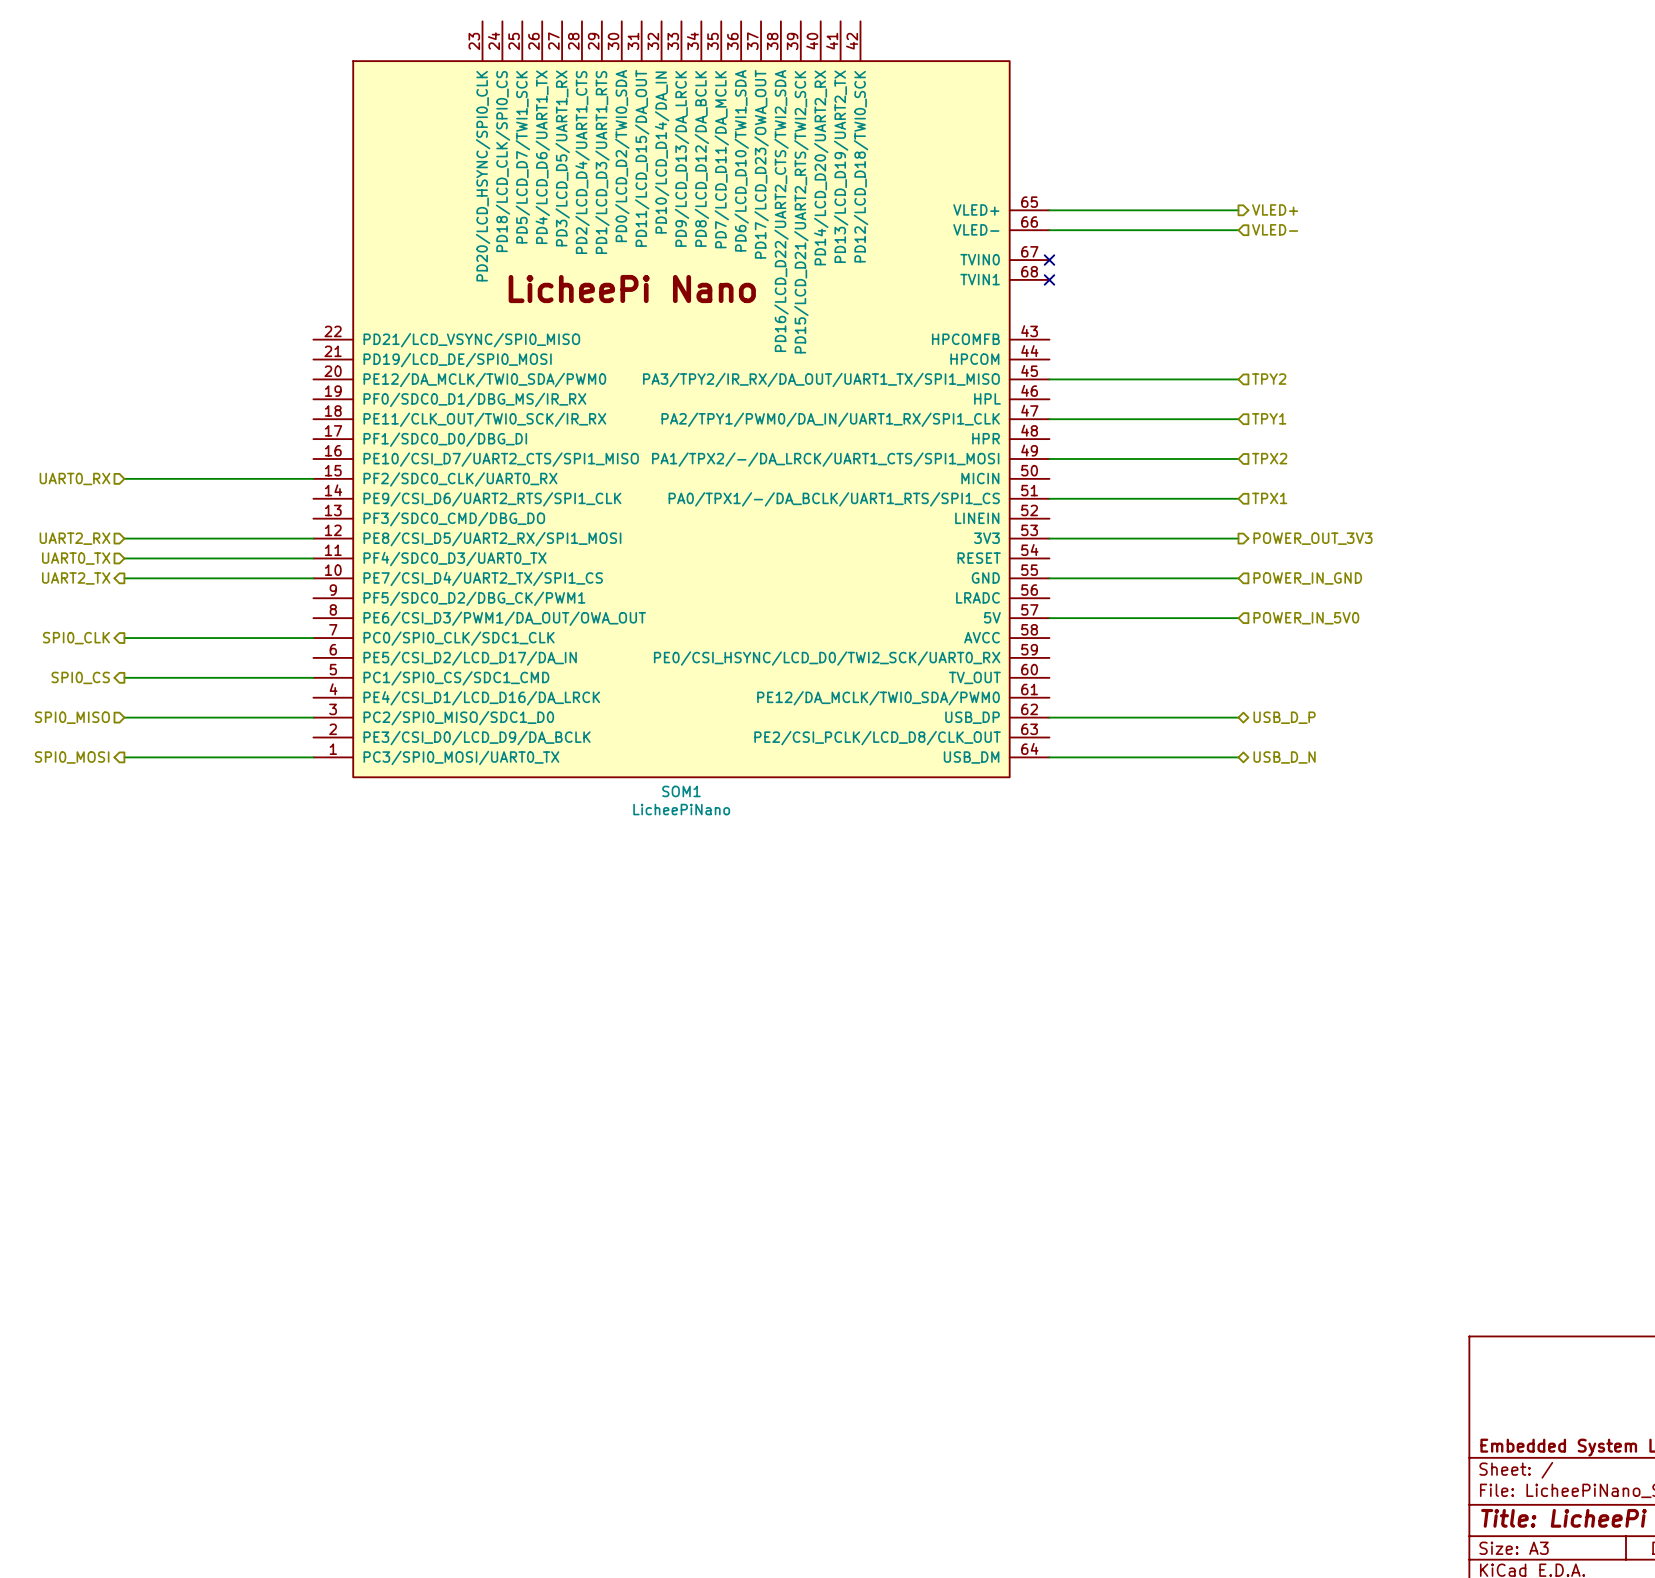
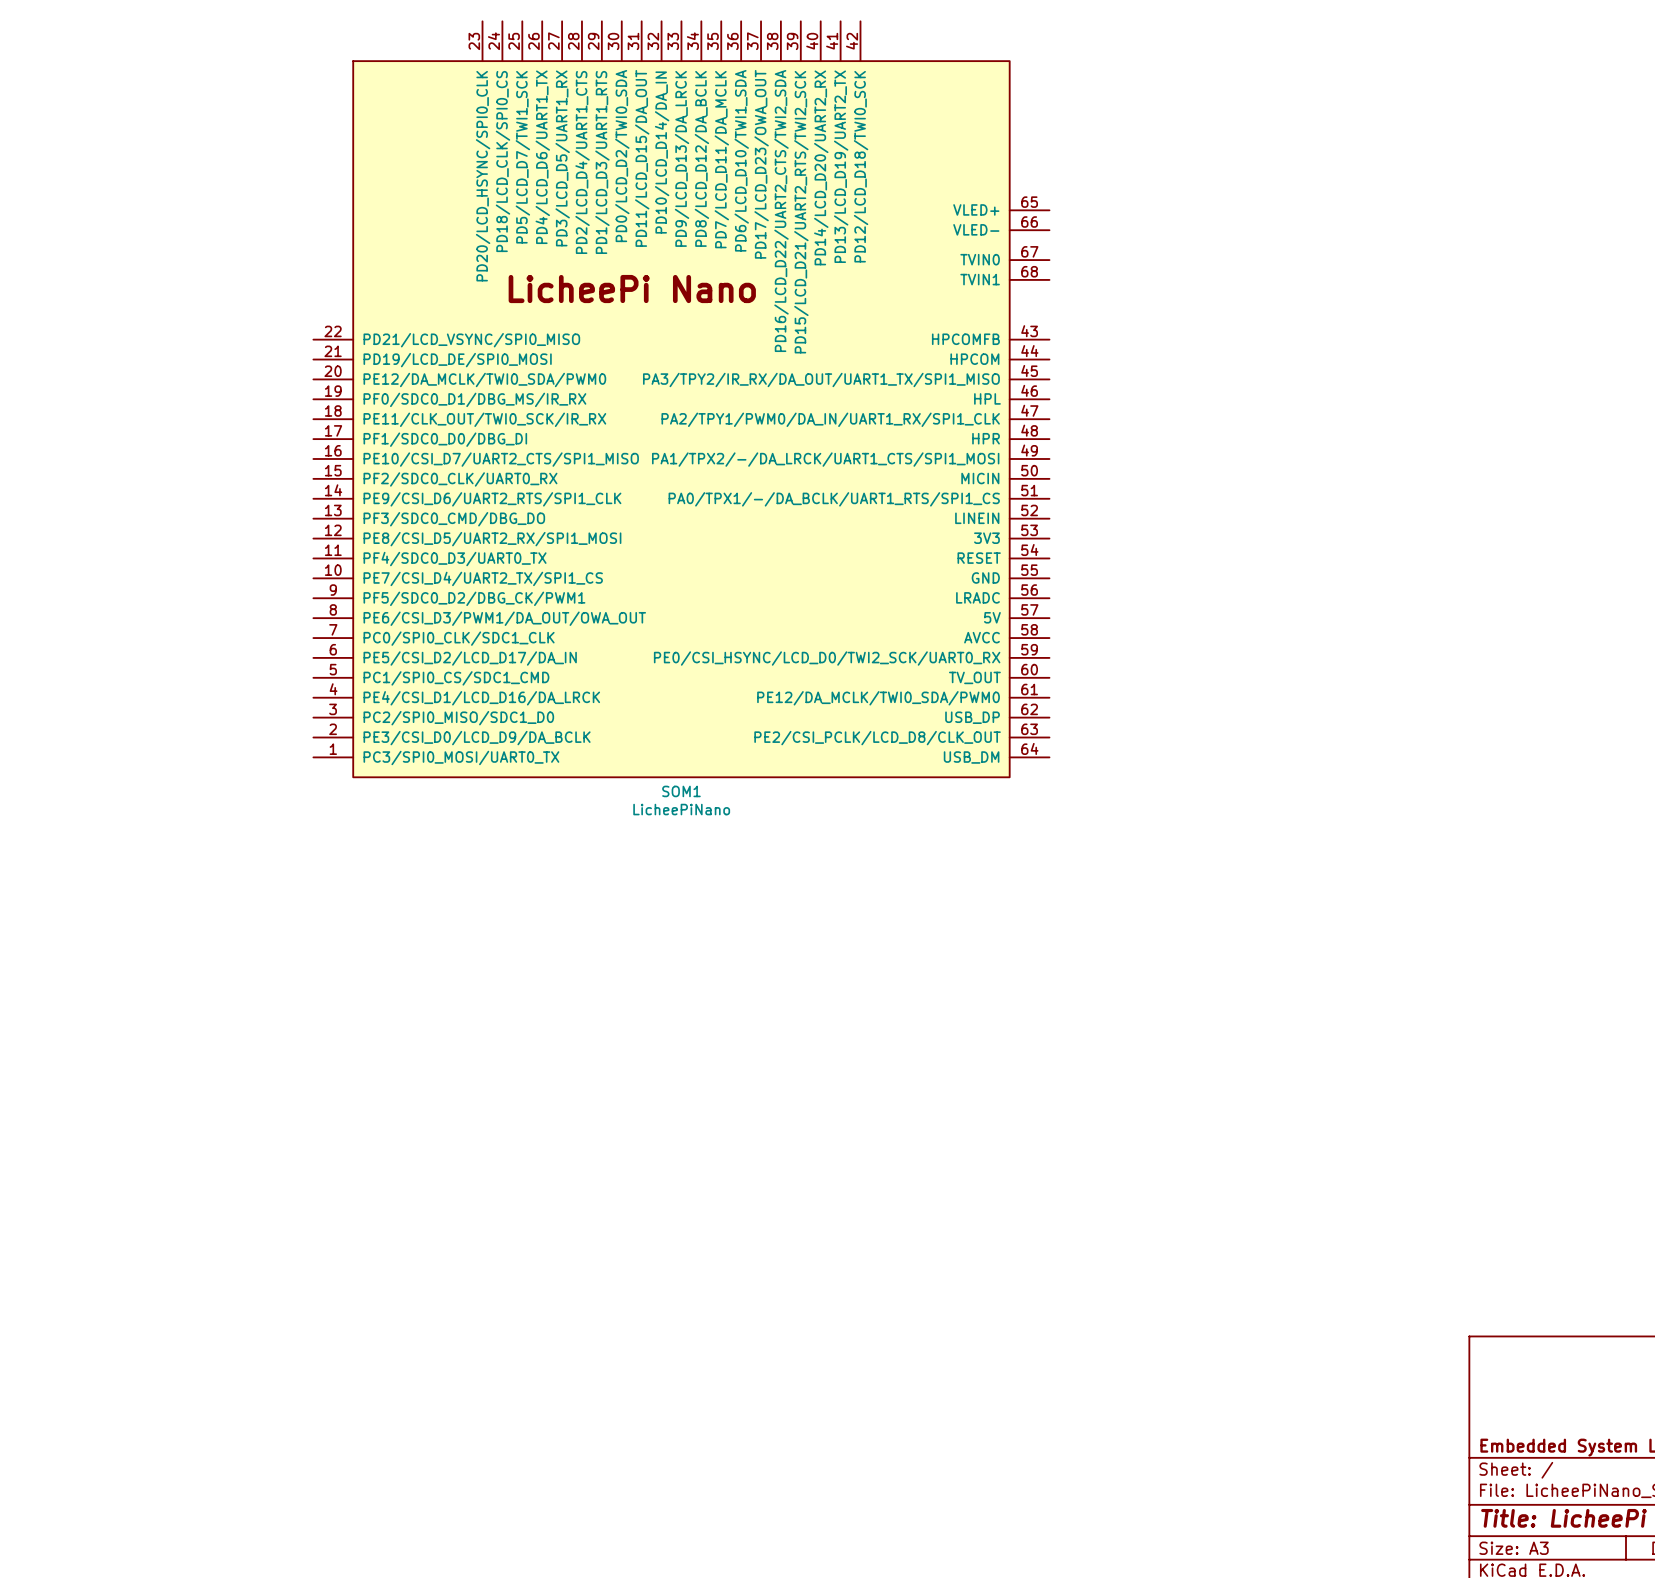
hierarchical label: VLED+ (1275, 209) -> none
wire: (1049, 210) (1238, 210) -> none
hierarchical label: VLED- (1275, 229) -> none
wire: (1049, 230) (1238, 230) -> none
no-connect mark: (1049, 260) -> none
no-connect mark: (1049, 279) -> none
wire: (1049, 379) (1238, 379) -> none
hierarchical label: TPY2 (1269, 379) -> none
hierarchical label: TPY1 (1269, 418) -> none
wire: (1049, 419) (1238, 419) -> none
wire: (1049, 458) (1238, 458) -> none
hierarchical label: TPX2 (1269, 458) -> none
hierarchical label: UART0_RX (75, 478) -> none
wire: (124, 478) (313, 478) -> none
wire: (1049, 498) (1238, 498) -> none
hierarchical label: TPX1 (1269, 498) -> none
hierarchical label: UART2_RX (75, 538) -> none
wire: (124, 538) (313, 538) -> none
wire: (1049, 538) (1238, 538) -> none
hierarchical label: POWER_OUT_3V3 (1312, 538) -> none
hierarchical label: UART0_TX (76, 558) -> none
wire: (124, 558) (313, 558) -> none
hierarchical label: UART2_TX (76, 578) -> none
wire: (124, 578) (313, 578) -> none
wire: (1049, 578) (1238, 578) -> none
hierarchical label: POWER_IN_GND (1307, 578) -> none
wire: (1049, 618) (1238, 618) -> none
hierarchical label: POWER_IN_5V0 (1306, 618) -> none
hierarchical label: SPI0_CLK (76, 638) -> none
wire: (124, 638) (313, 638) -> none
hierarchical label: SPI0_CS (80, 677) -> none
wire: (124, 677) (313, 677) -> none
hierarchical label: SPI0_MISO (72, 717) -> none
wire: (124, 717) (313, 717) -> none
wire: (1049, 717) (1238, 717) -> none
hierarchical label: USB_D_P (1284, 717) -> none
hierarchical label: SPI0_MOSI (72, 757) -> none
wire: (124, 757) (313, 757) -> none
wire: (1049, 757) (1238, 757) -> none
hierarchical label: USB_D_N (1284, 757) -> none

